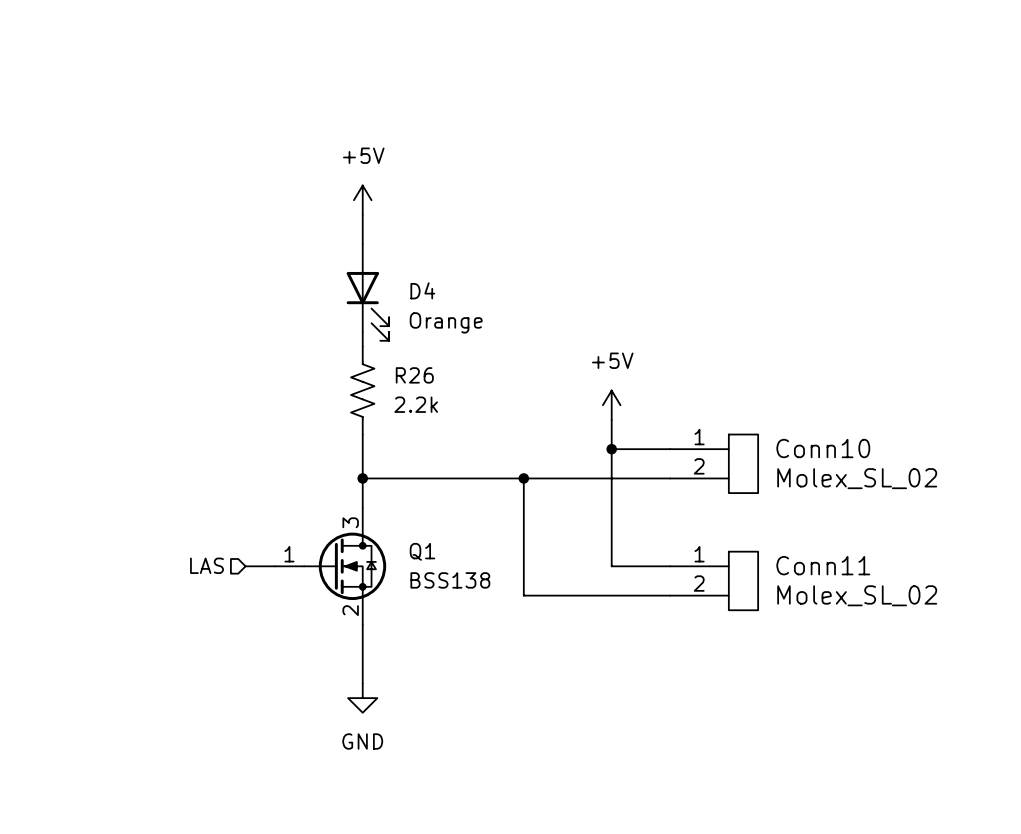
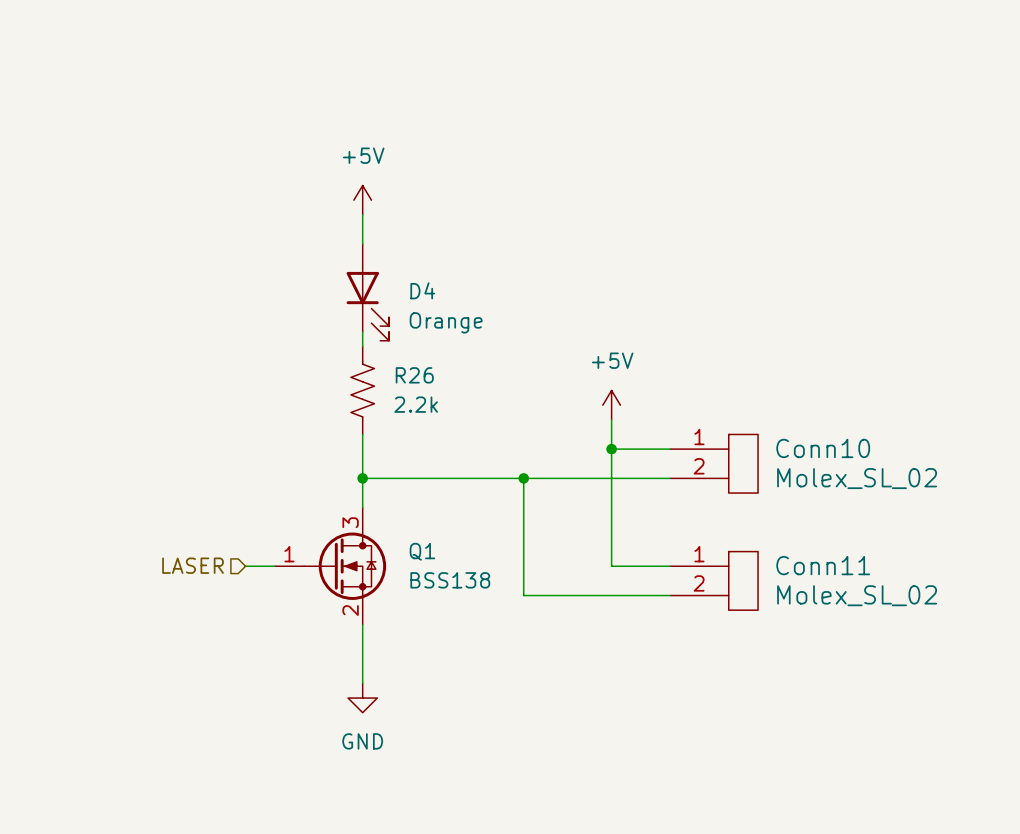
hierarchical label: LAS (206, 565) -> LASER (193, 565)

